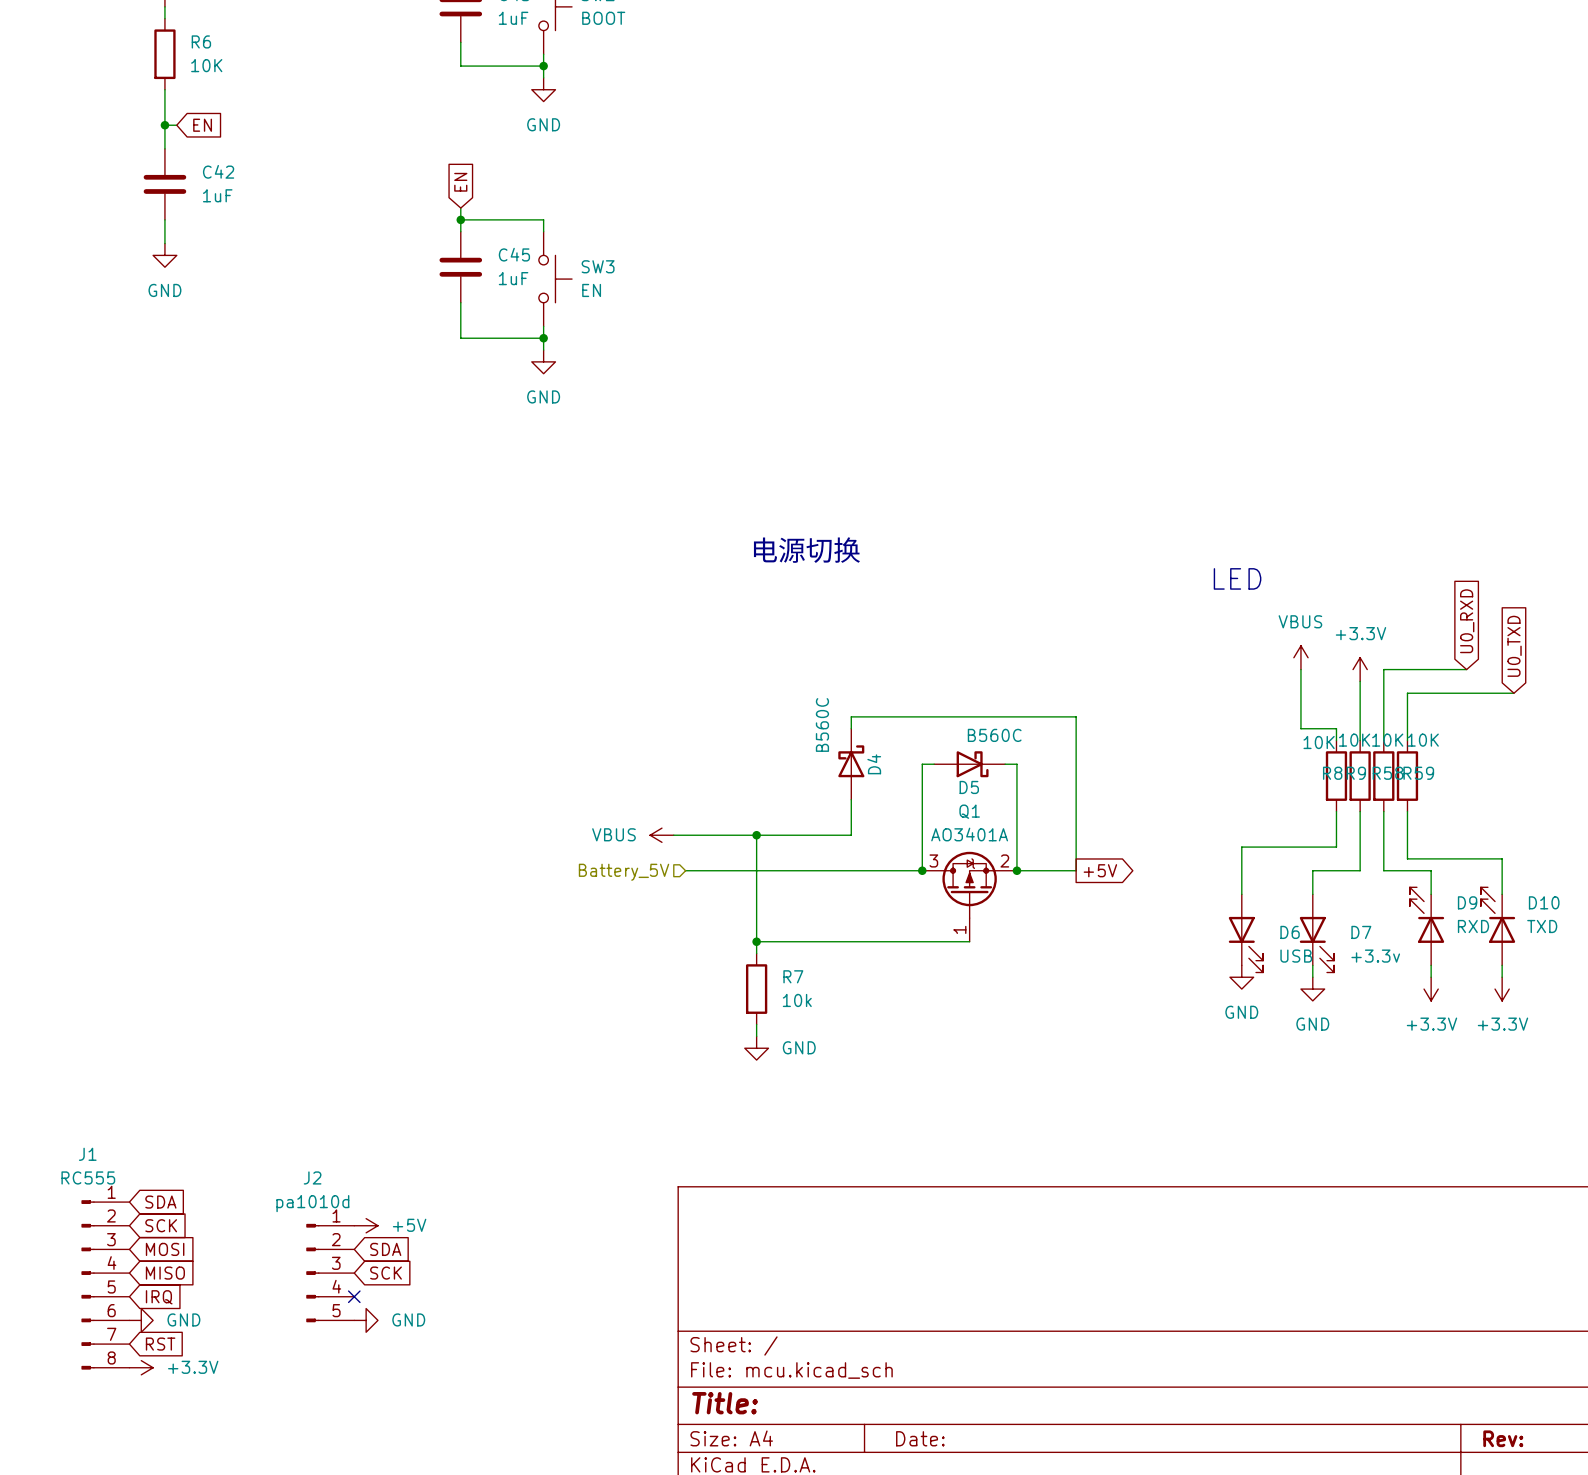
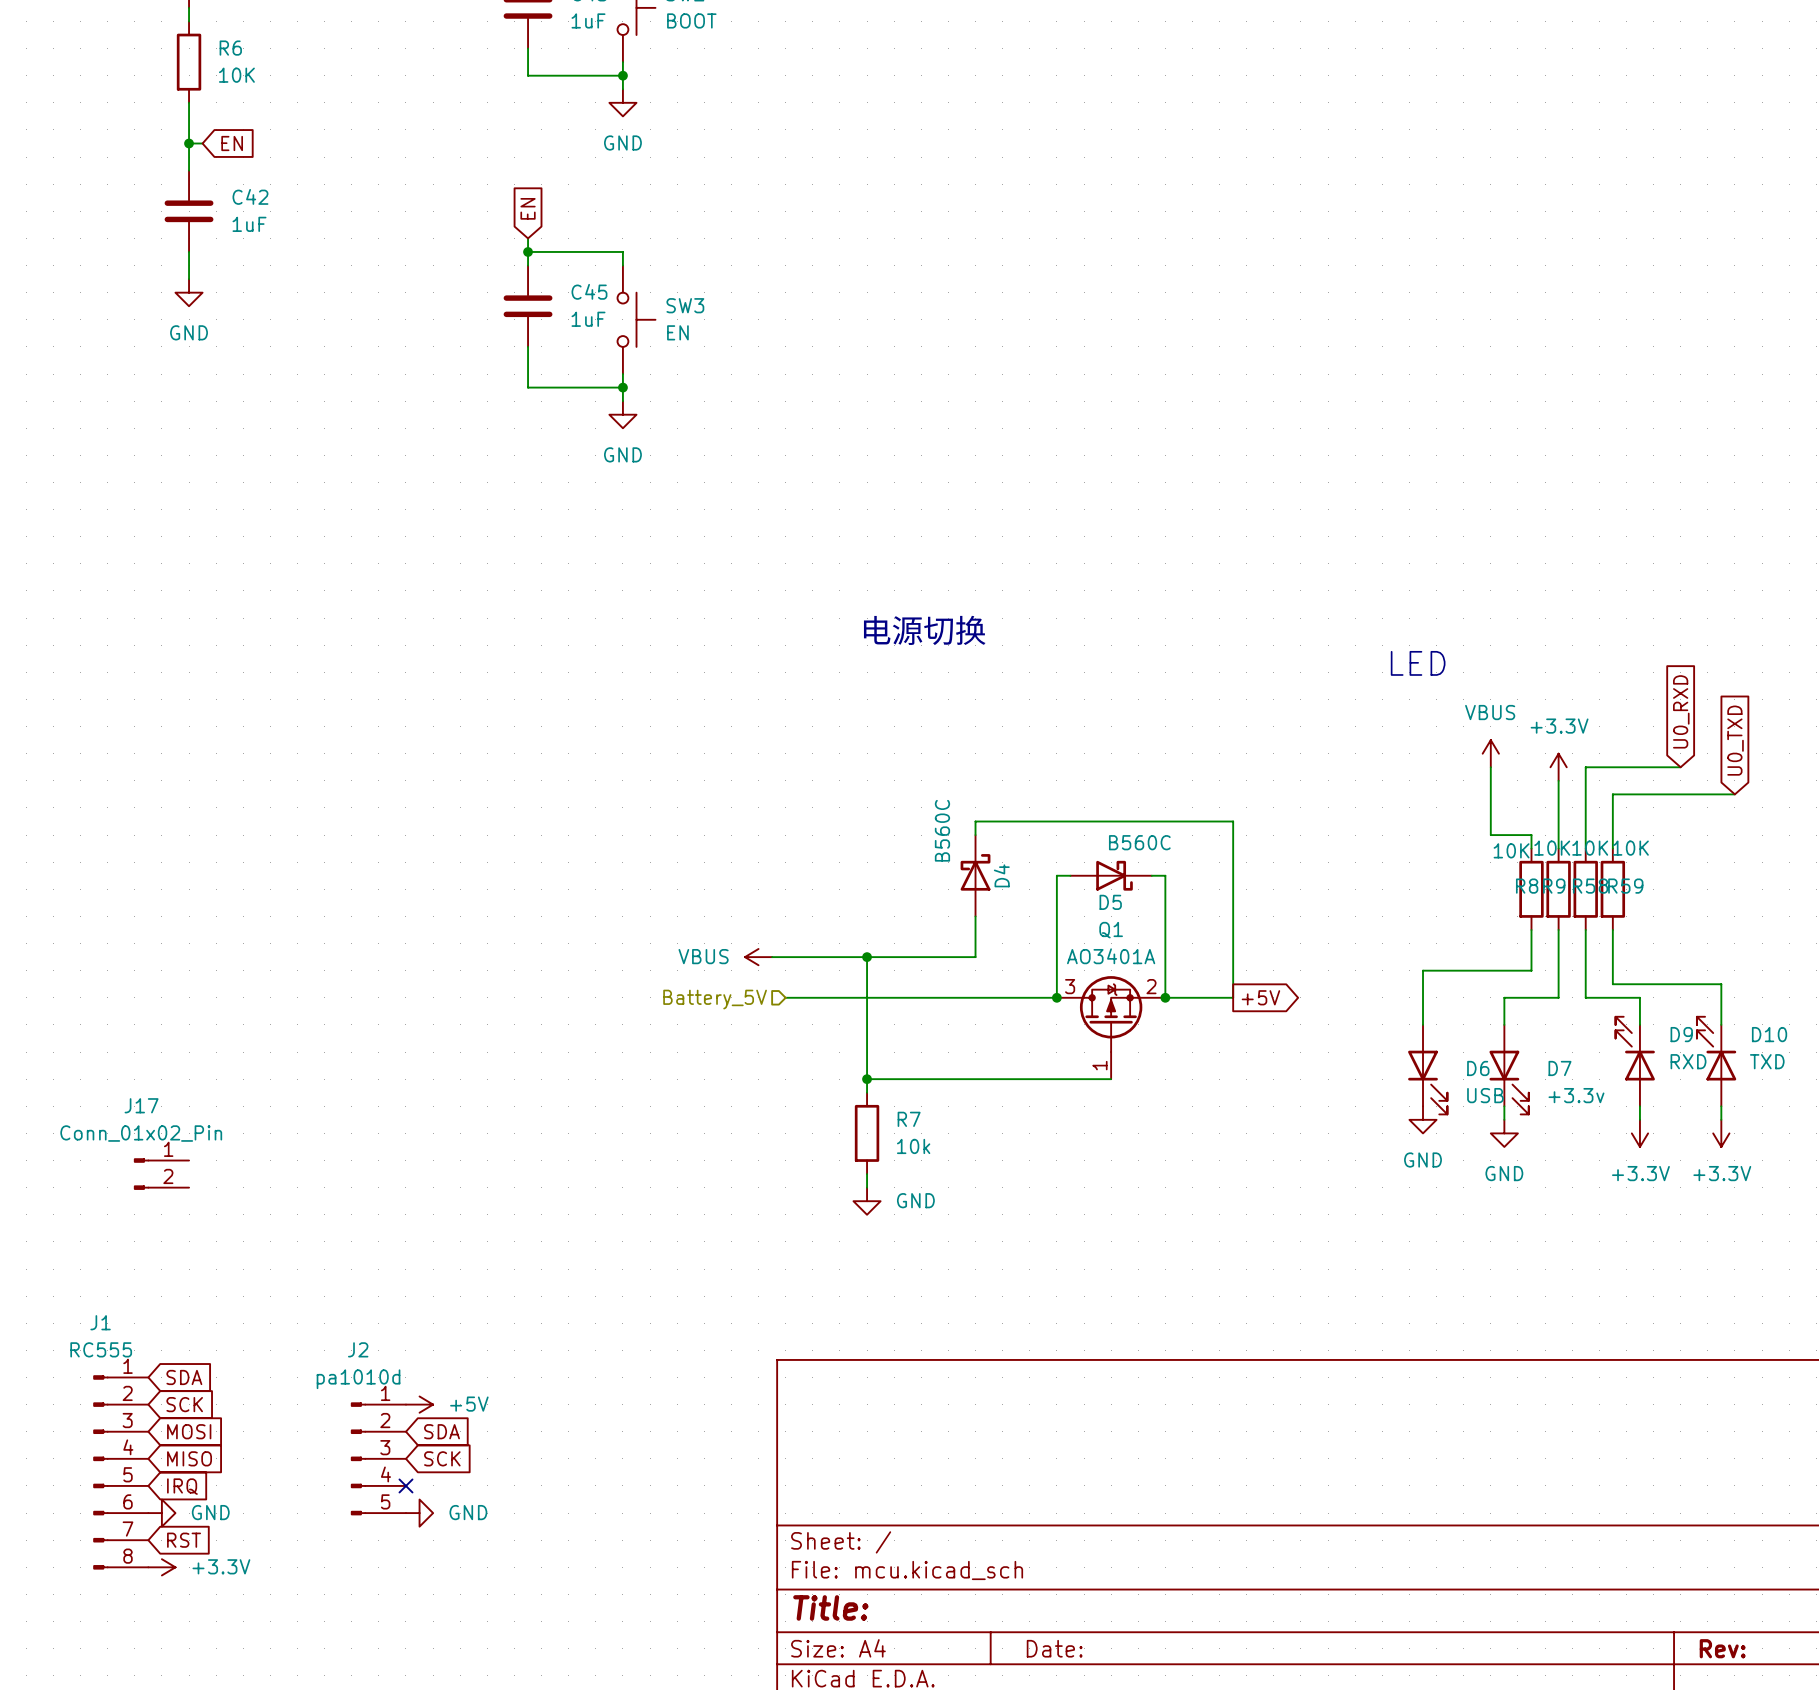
J17: none -> Conn_01x02_Pin (161, 1174)

